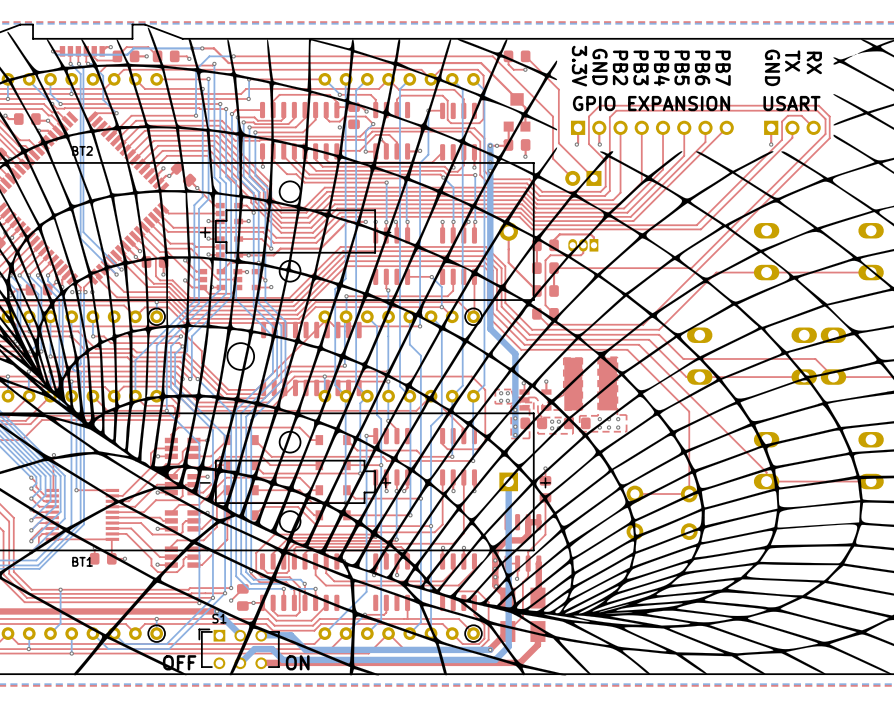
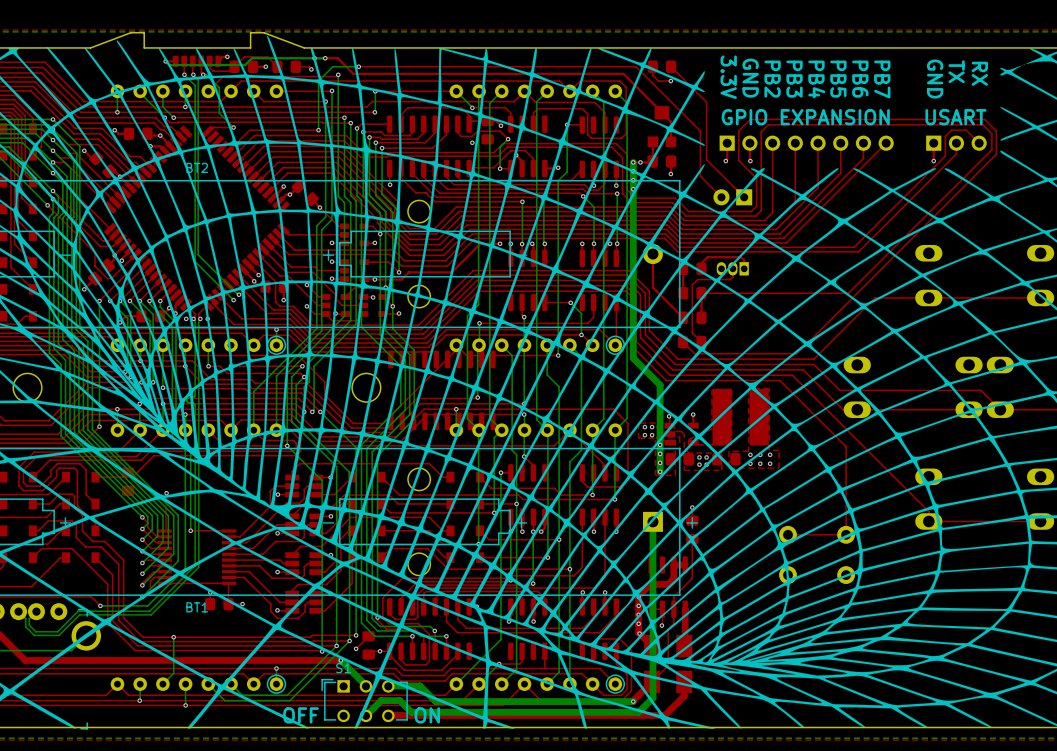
part: none -> (128, 481)

